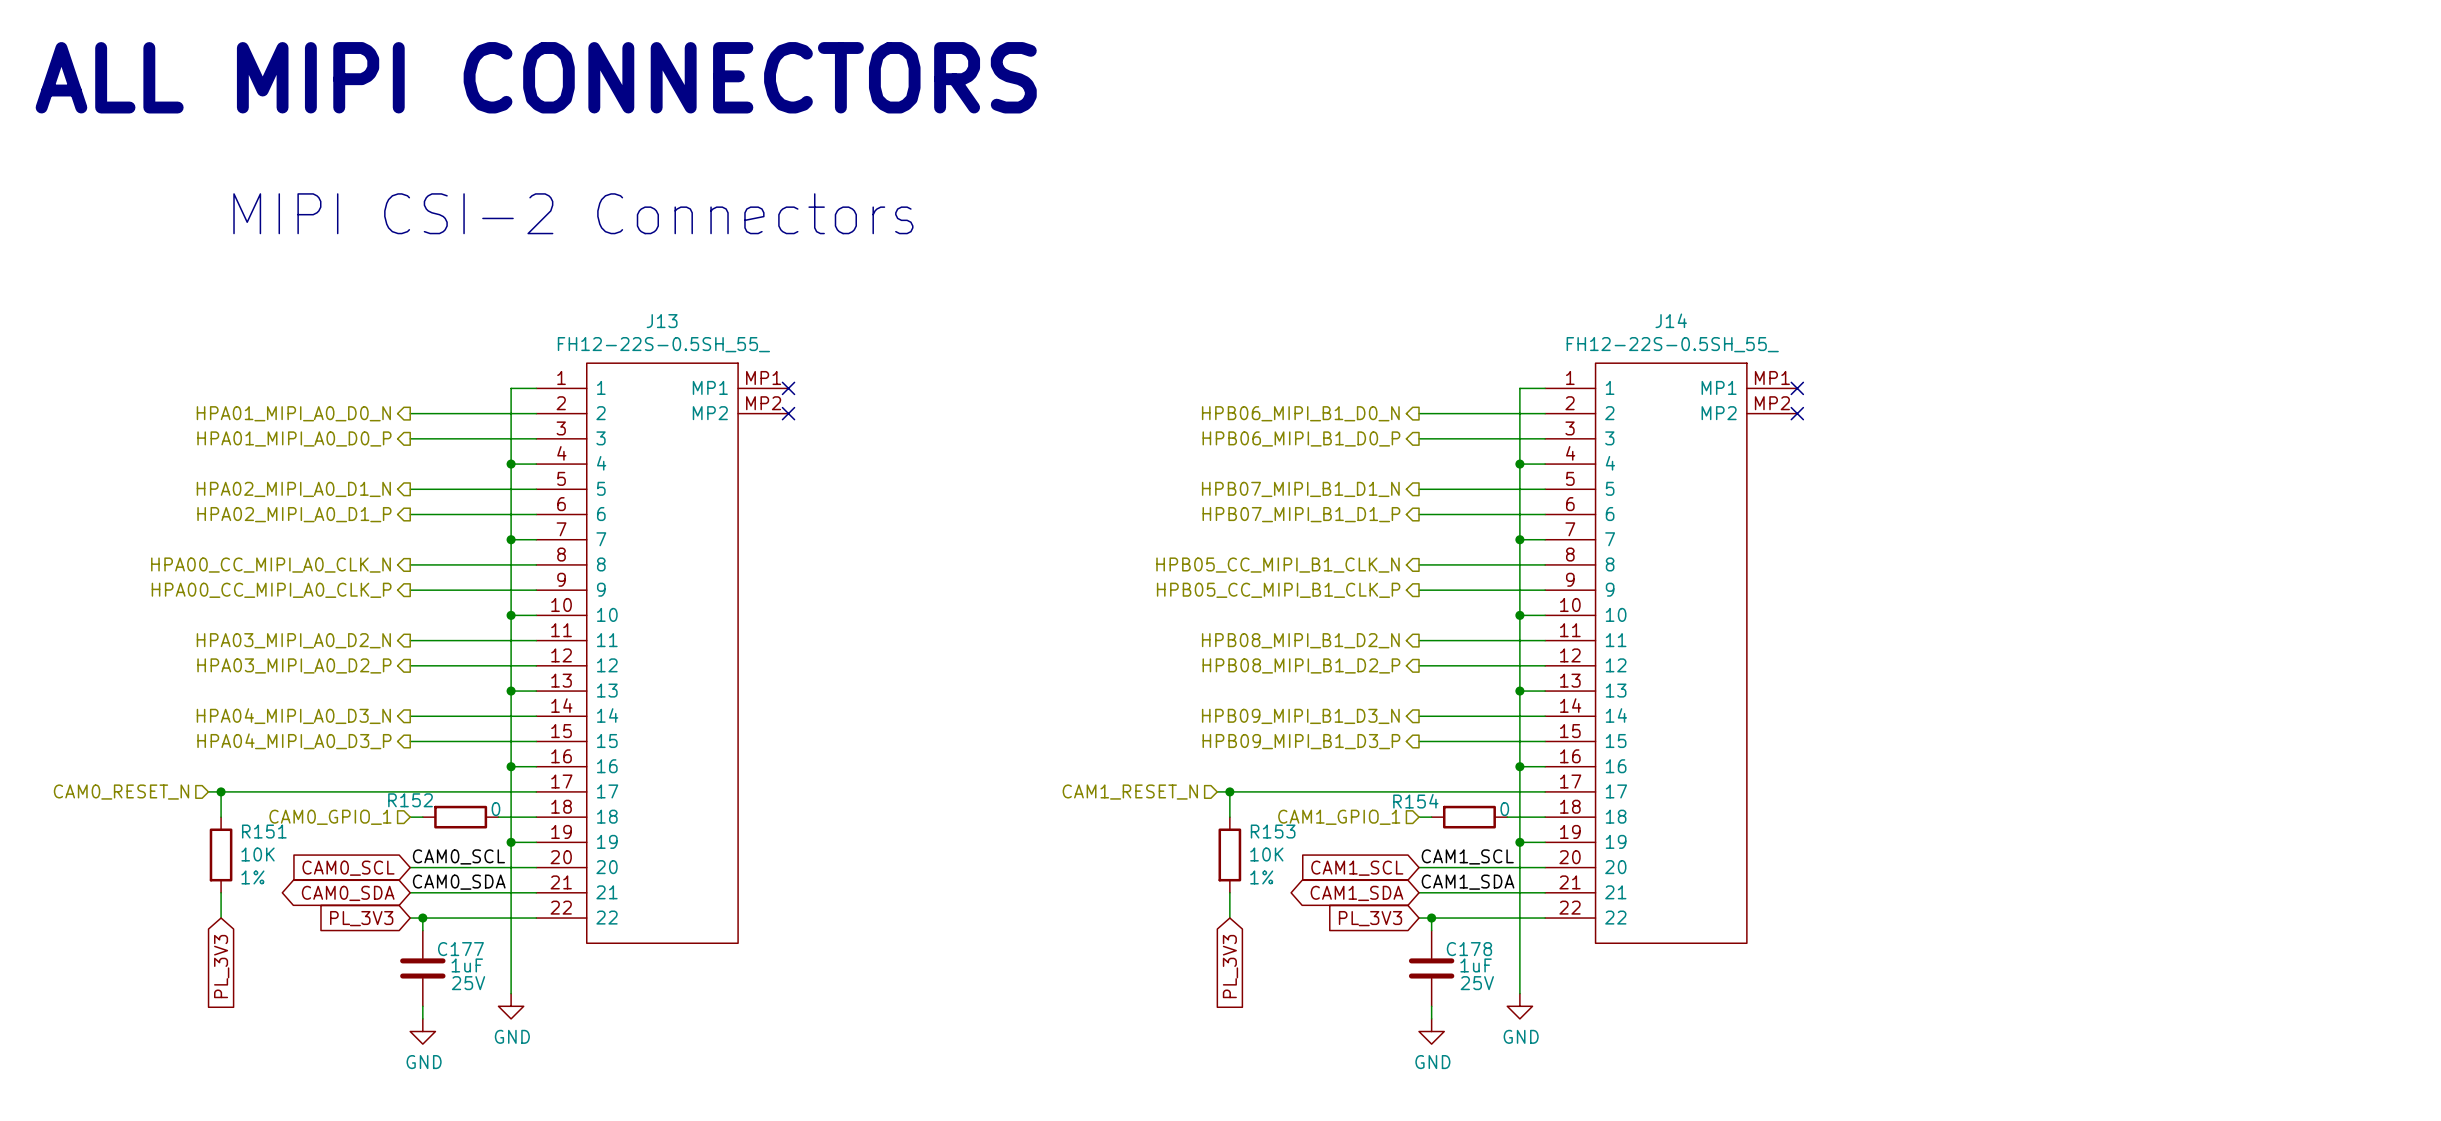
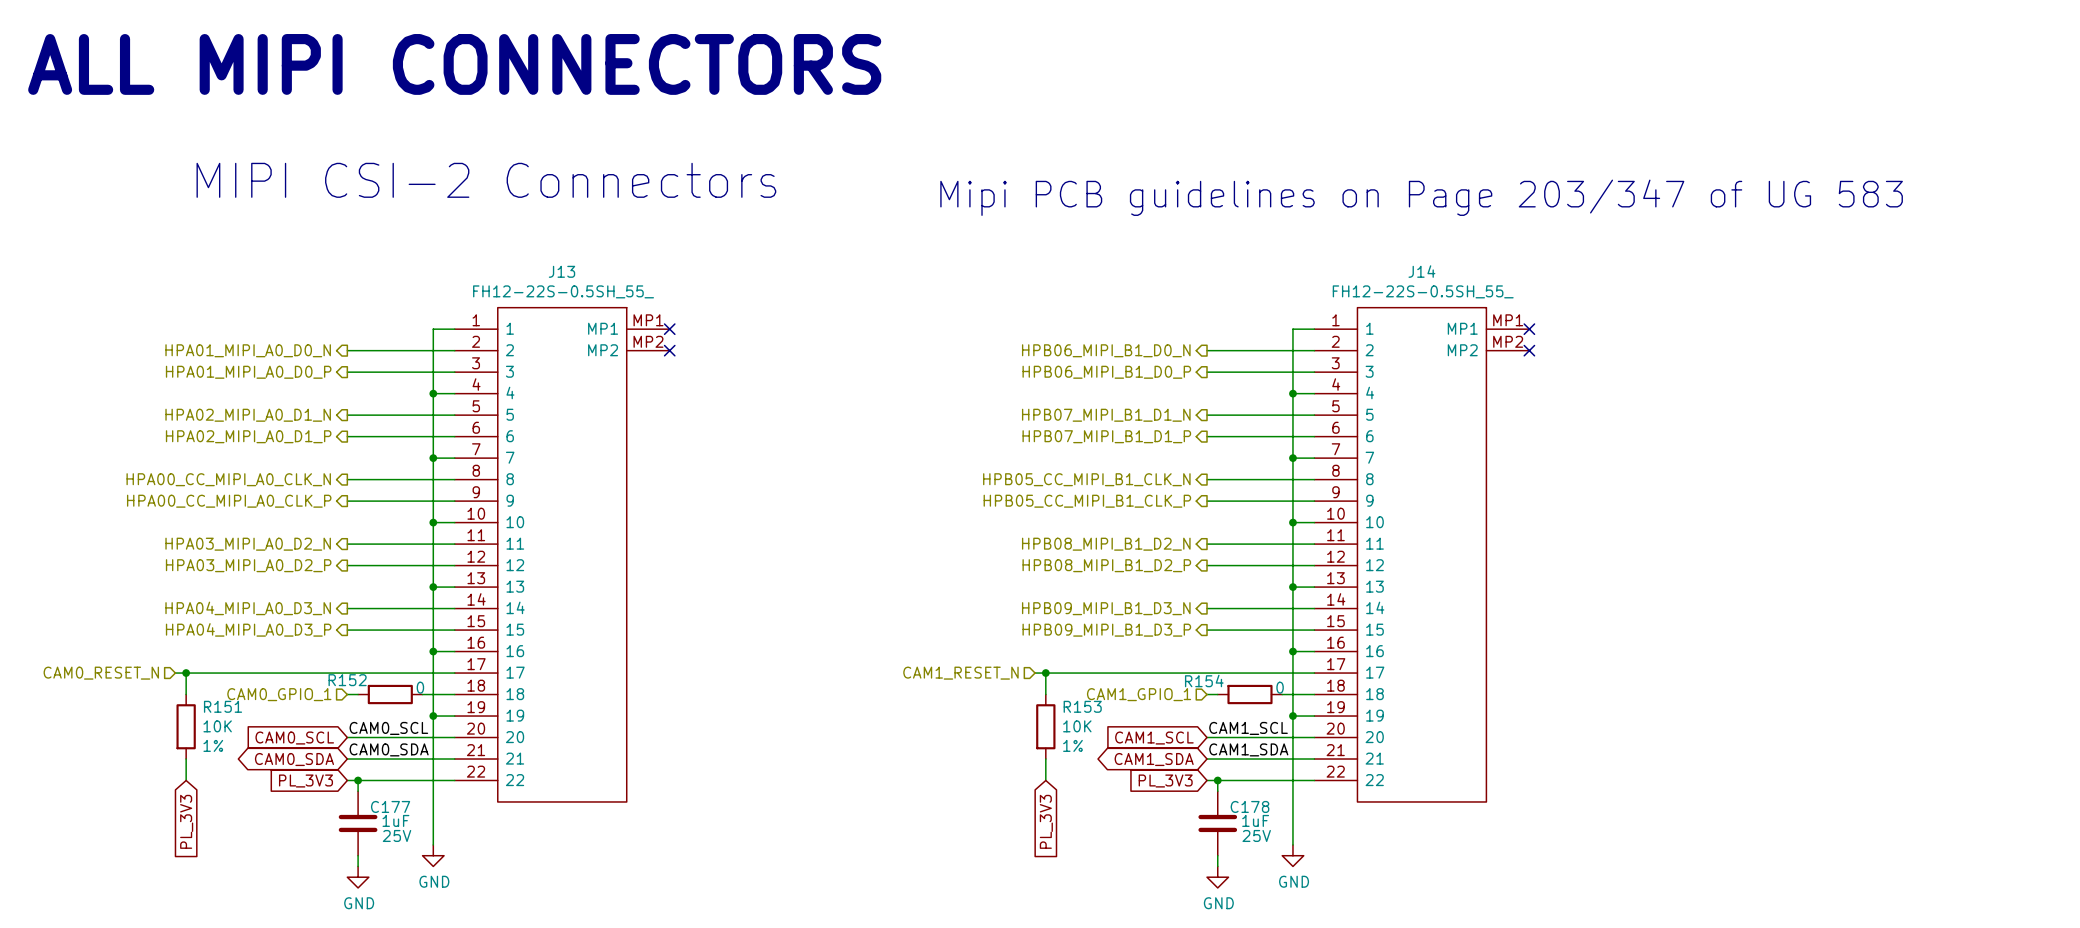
text: none -> Mipi PCB guidelines on Page 203/347 of UG 583 (1421, 197)

